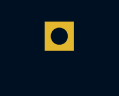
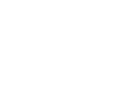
part: (59, 36) -> none

